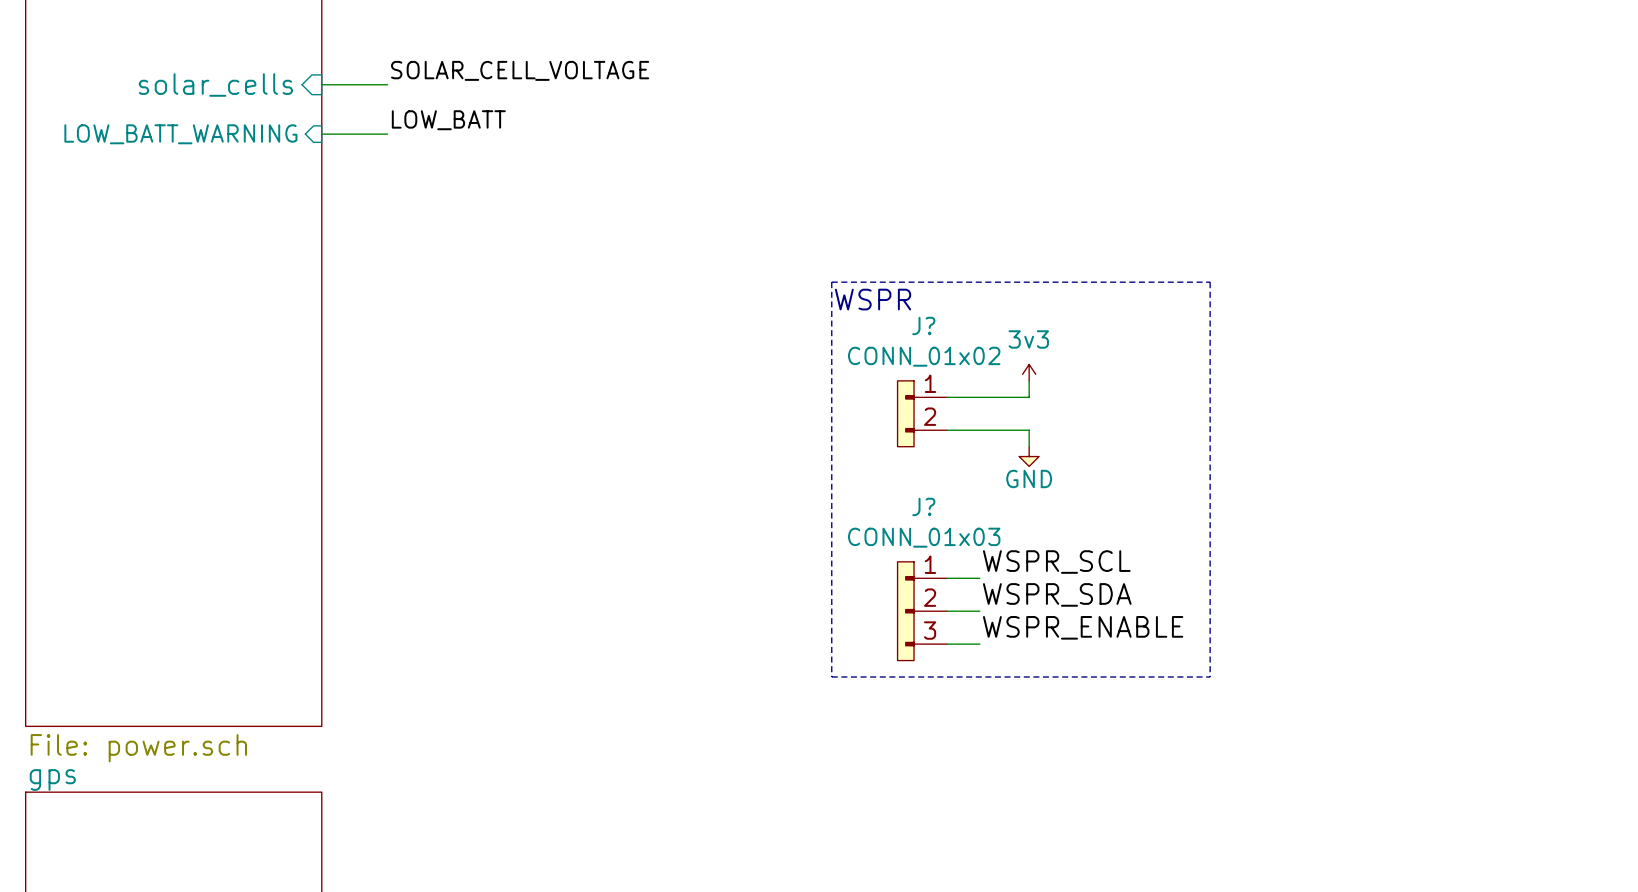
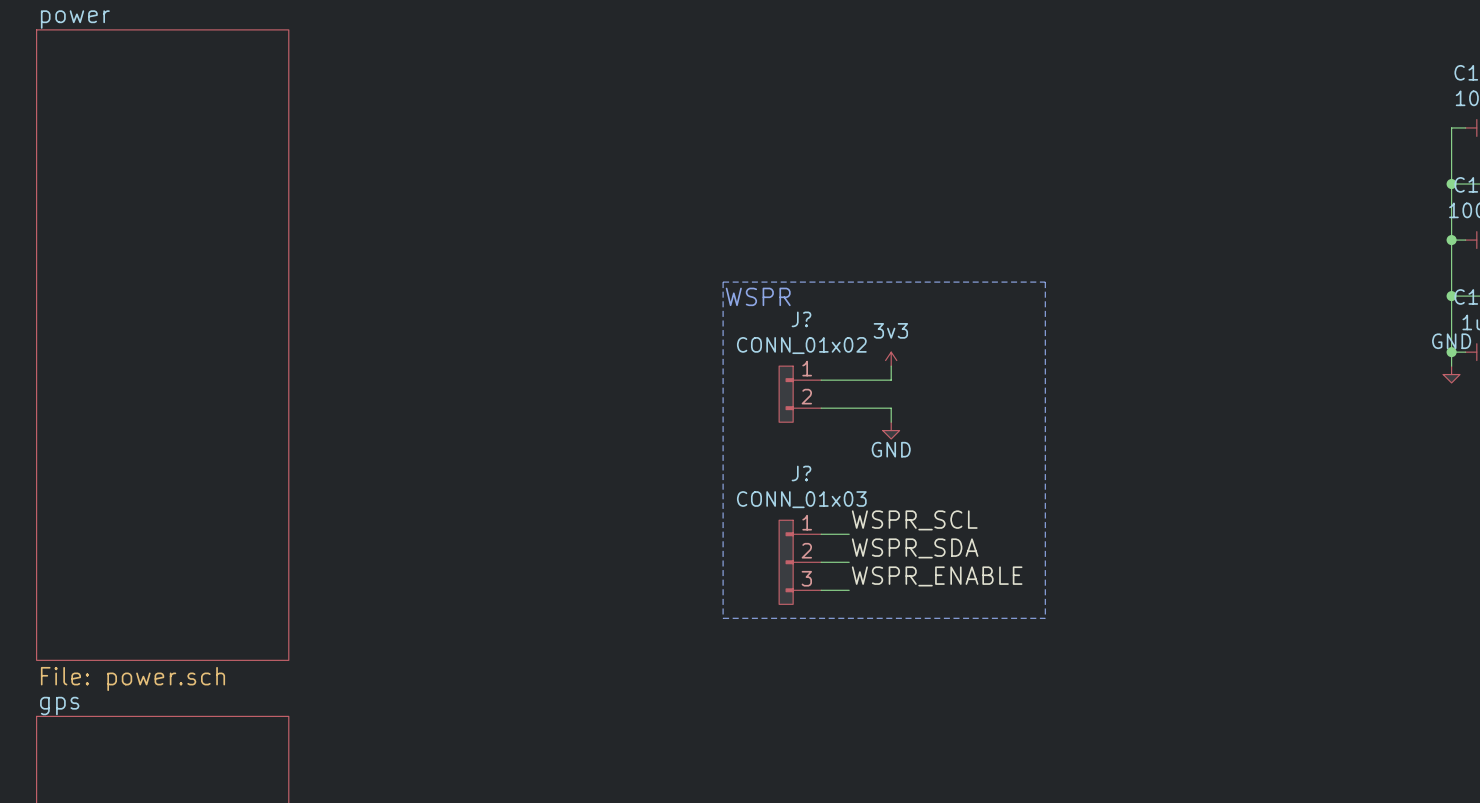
label: SOLAR_CELL_VOLTAGE (520, 70) -> none
sheet pin: solar_cells (215, 84) -> none
wire: (321, 84) (387, 84) -> none
label: LOW_BATT (448, 120) -> none
sheet pin: LOW_BATT_WARNING (180, 134) -> none
wire: (321, 134) (387, 134) -> none

